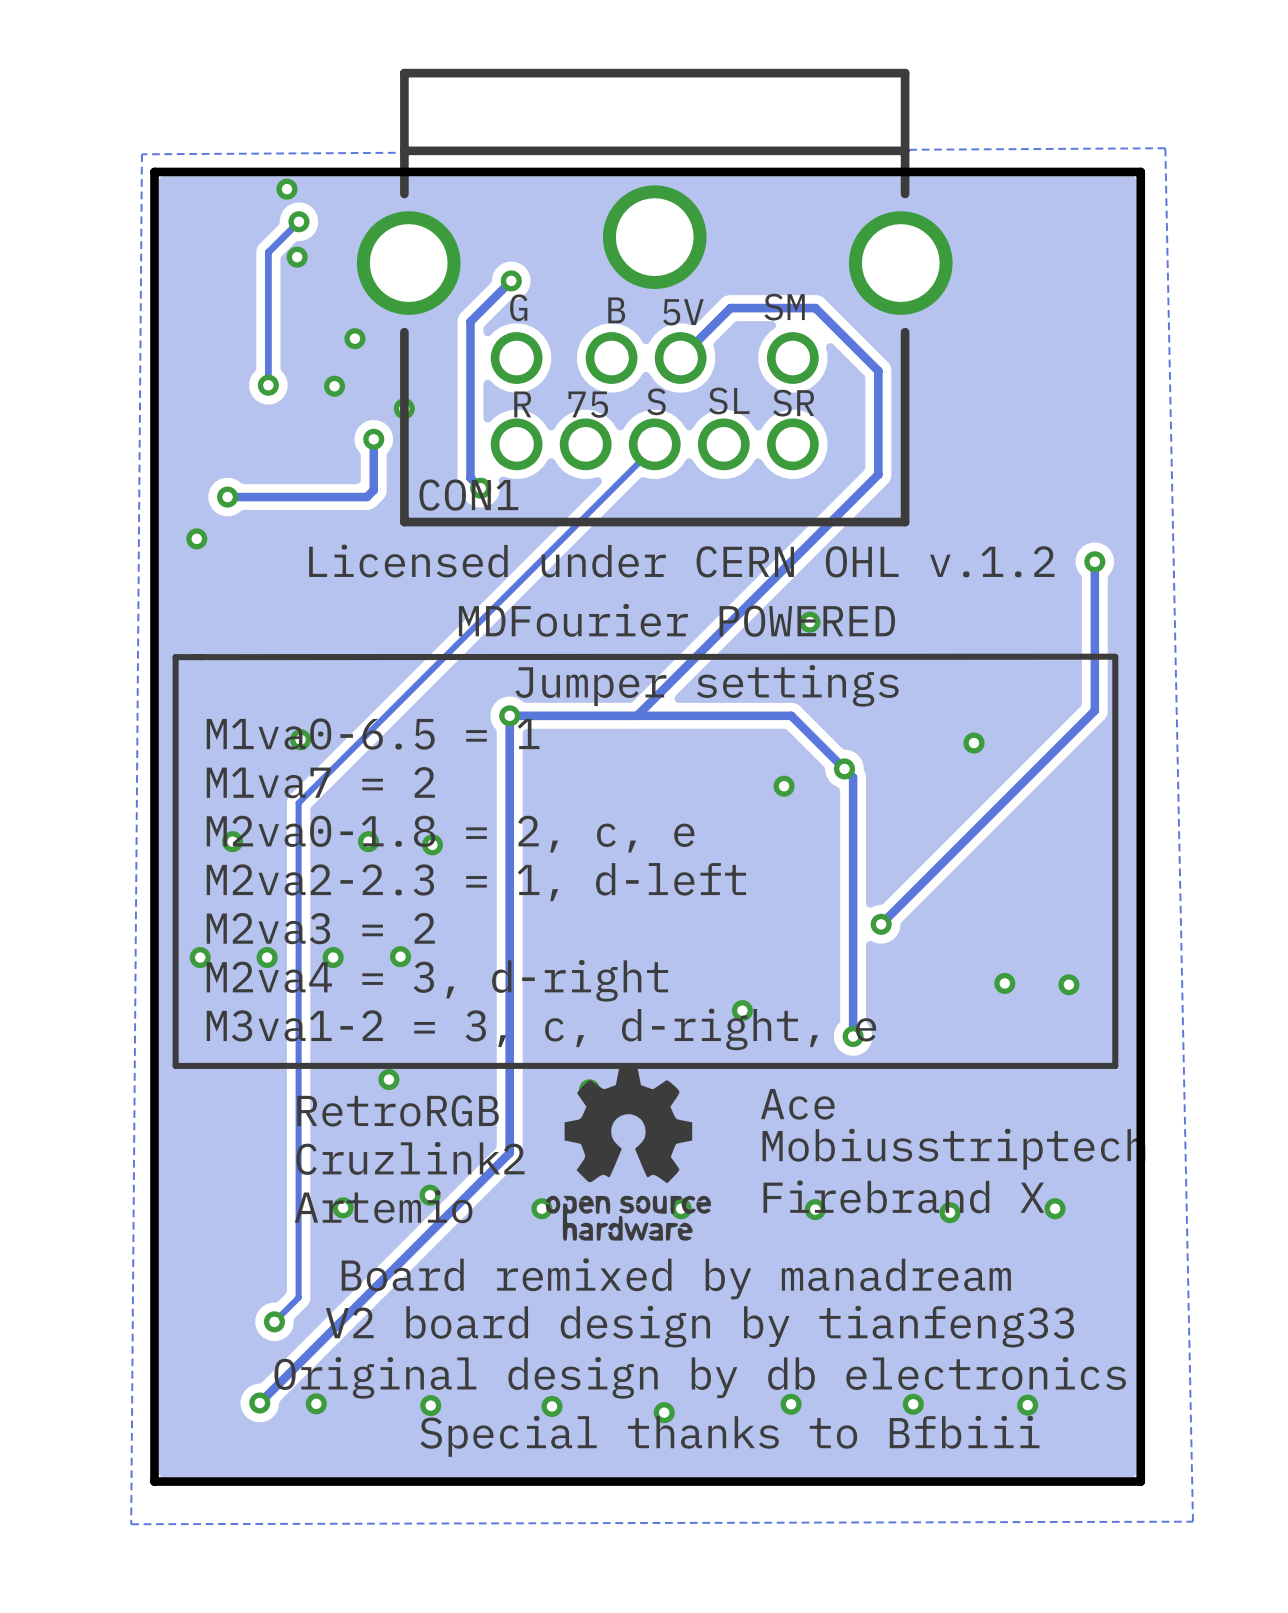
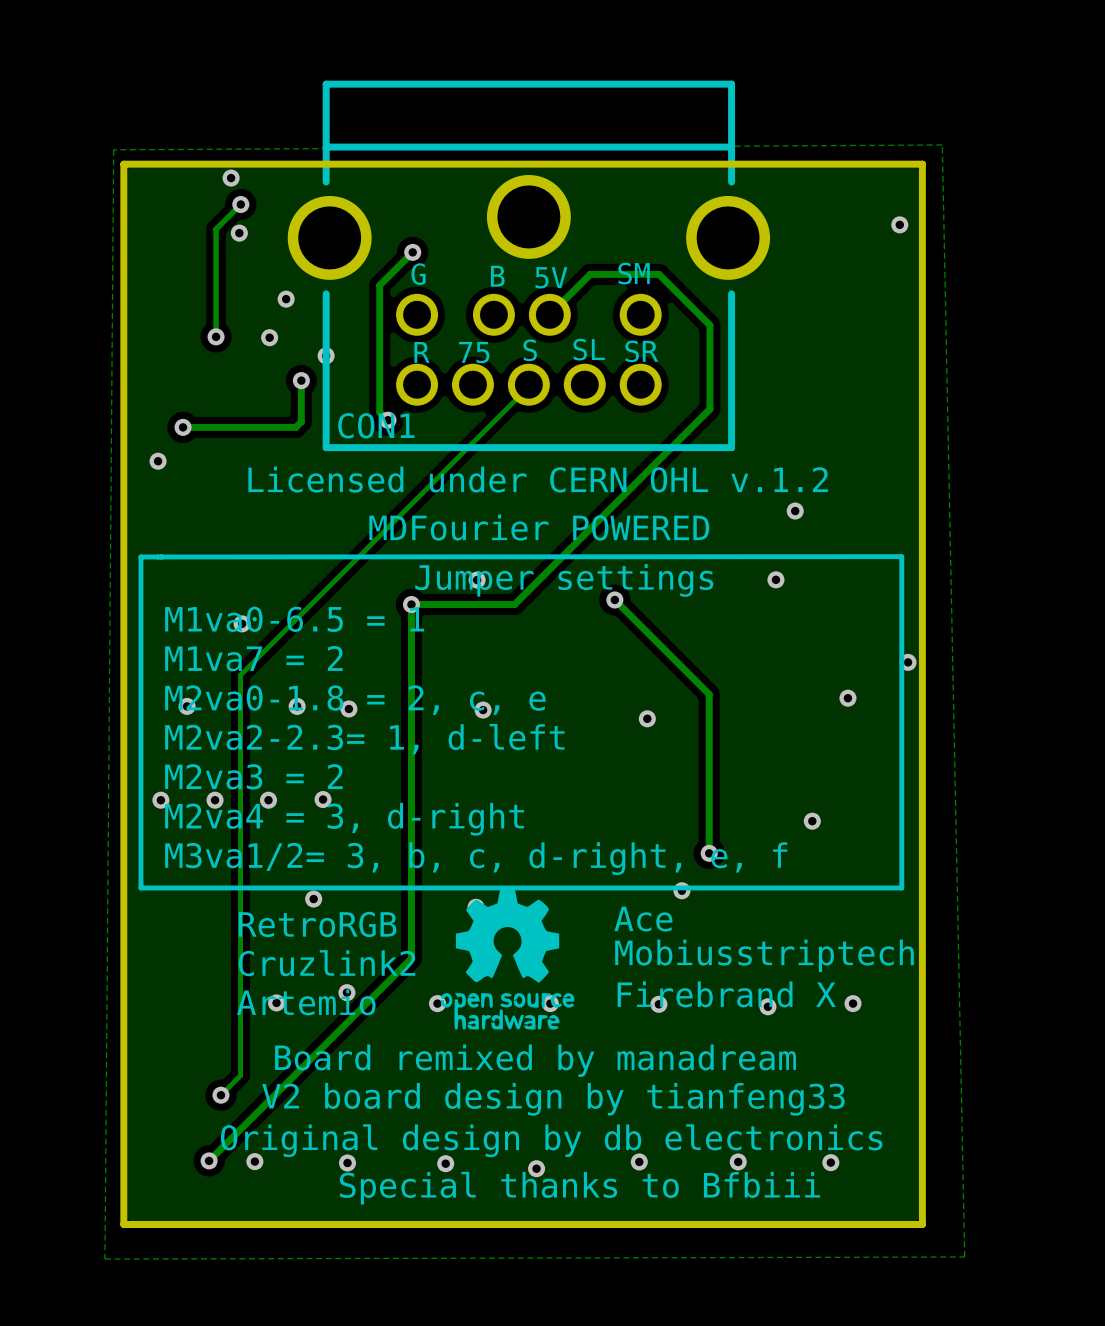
via: none -> (899, 224)
track: (1094, 561) (1094, 710) (881, 924) -> none
via: (1094, 561) -> none
via: none -> (795, 511)
via: (809, 622) -> none
via: none -> (477, 580)
via: none -> (775, 579)
track: none -> (614, 599) (709, 694) (709, 853)
via: none -> (614, 599)
track: (637, 715) (791, 715) (853, 777) (853, 1036) -> none
via: (973, 743) -> none
via: (844, 768) -> none
via: (784, 786) -> none
via: none -> (908, 662)
via: none -> (847, 698)
via: none -> (483, 710)
via: none -> (647, 718)
text: M2va2-2.3 = 1, d-left (476, 882) -> M2va2-2.3= 1, d-left (364, 739)
via: (881, 924) -> none
via: (1068, 984) -> none
via: (742, 1010) -> none
via: none -> (709, 853)
text: M3va1-2 = 3, c, d-right, e (541, 1029) -> M3va1/2= 3, b, c, d-right, e, f (476, 858)
via: (853, 1036) -> none
via: none -> (681, 890)

